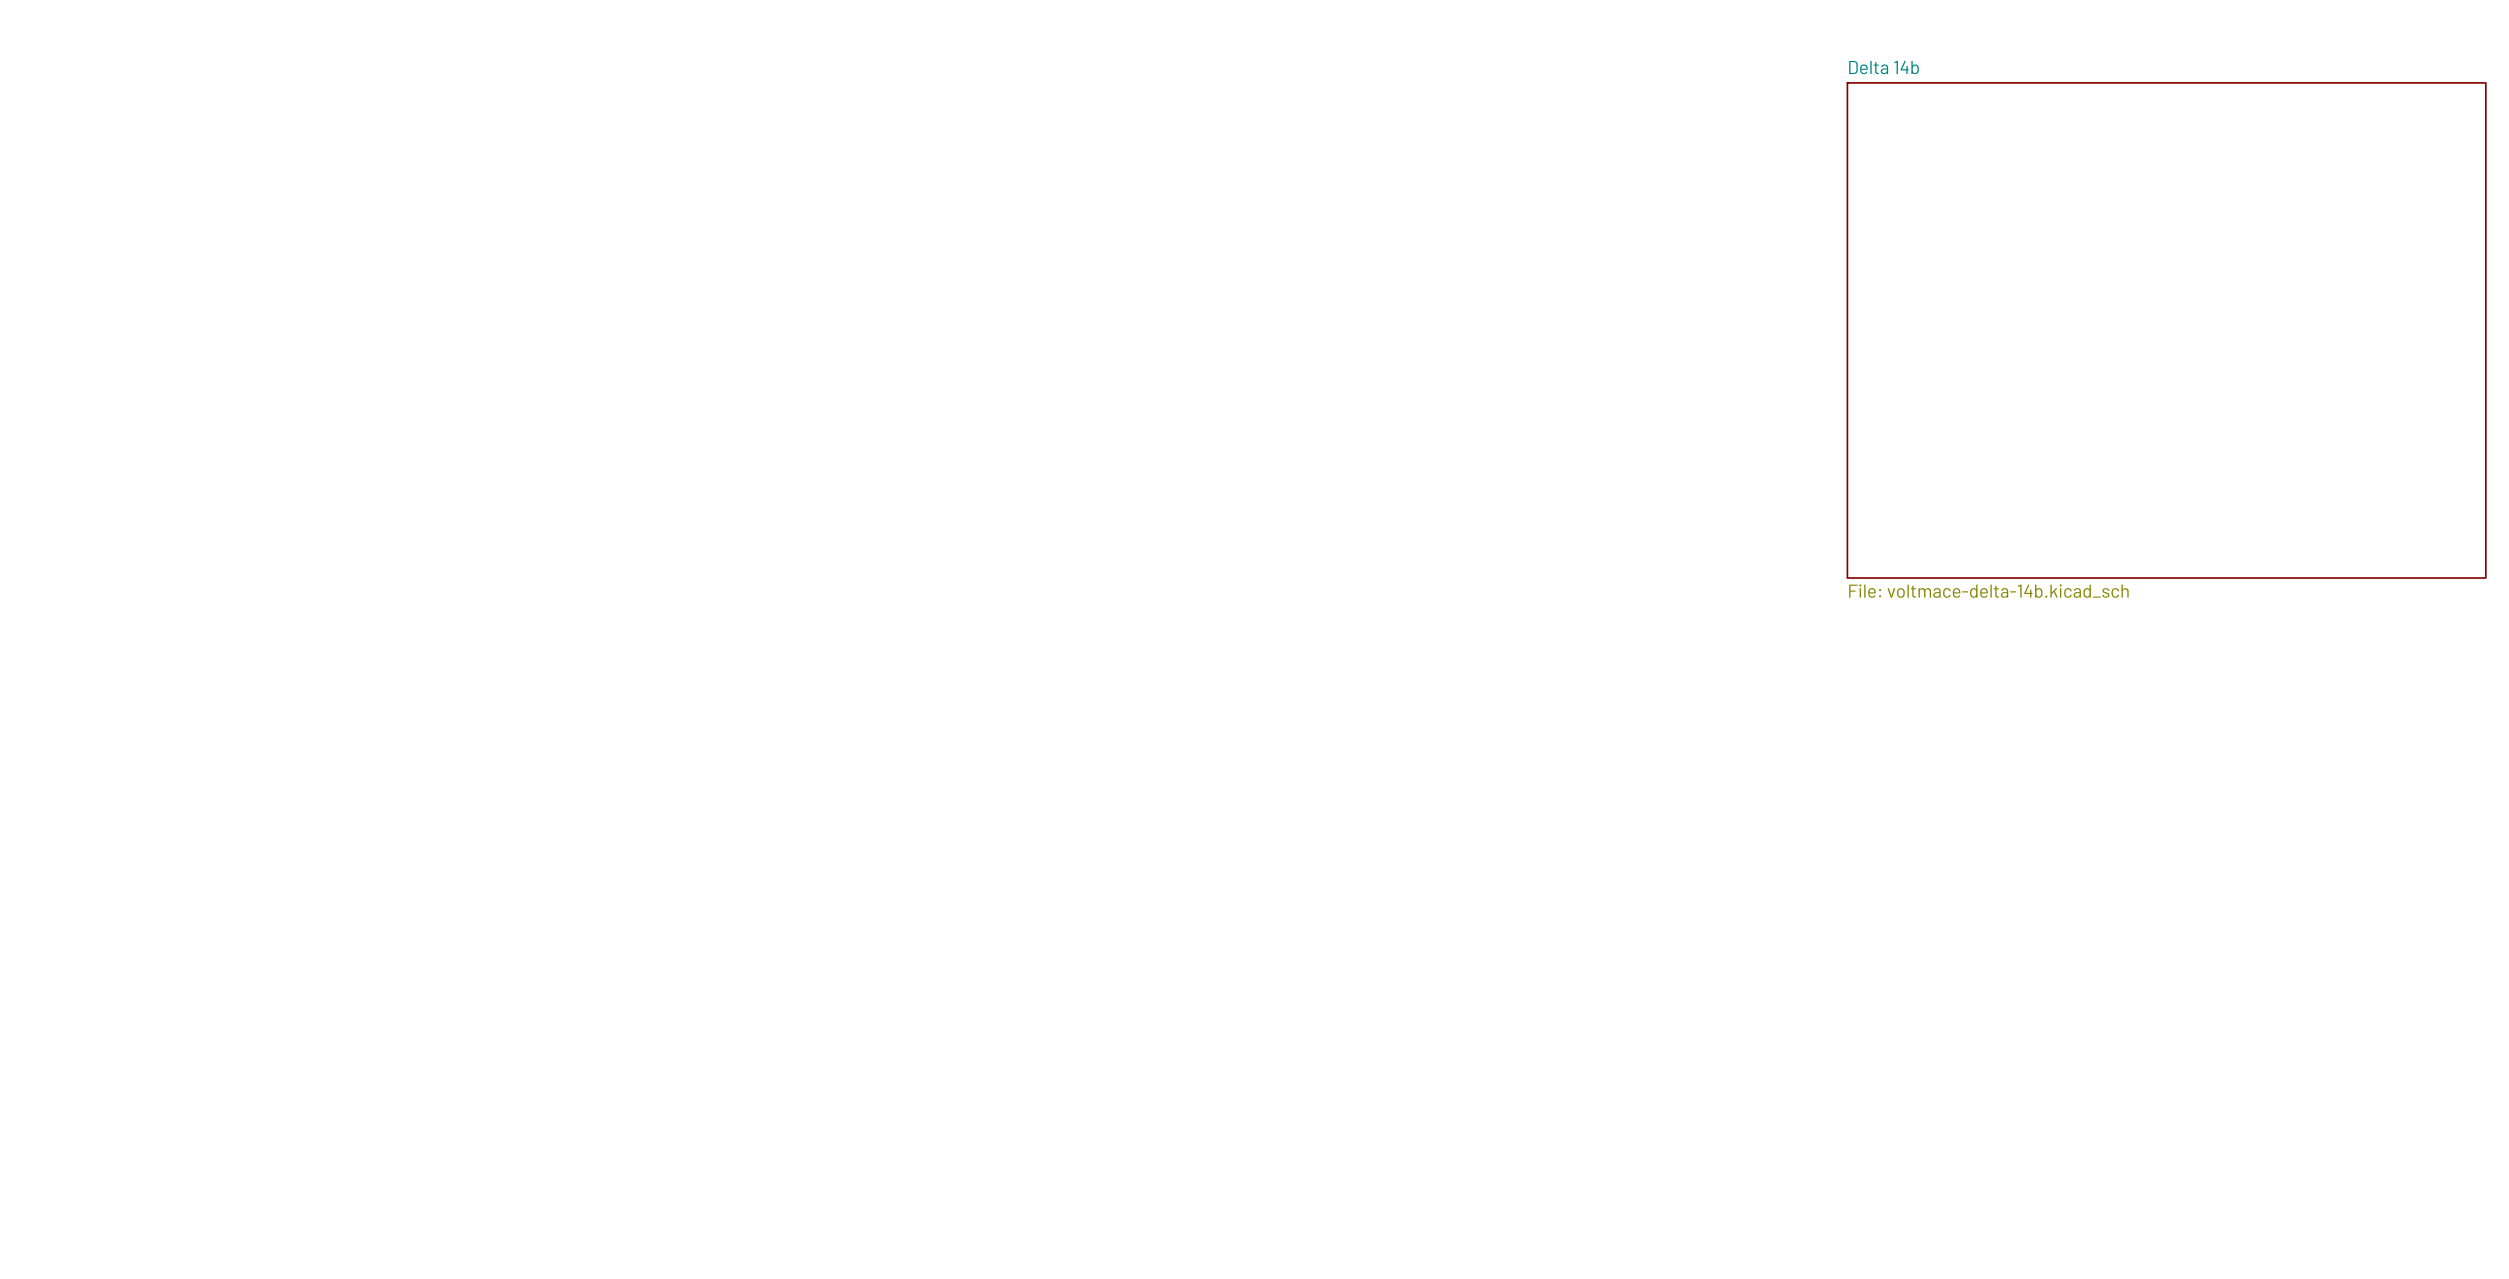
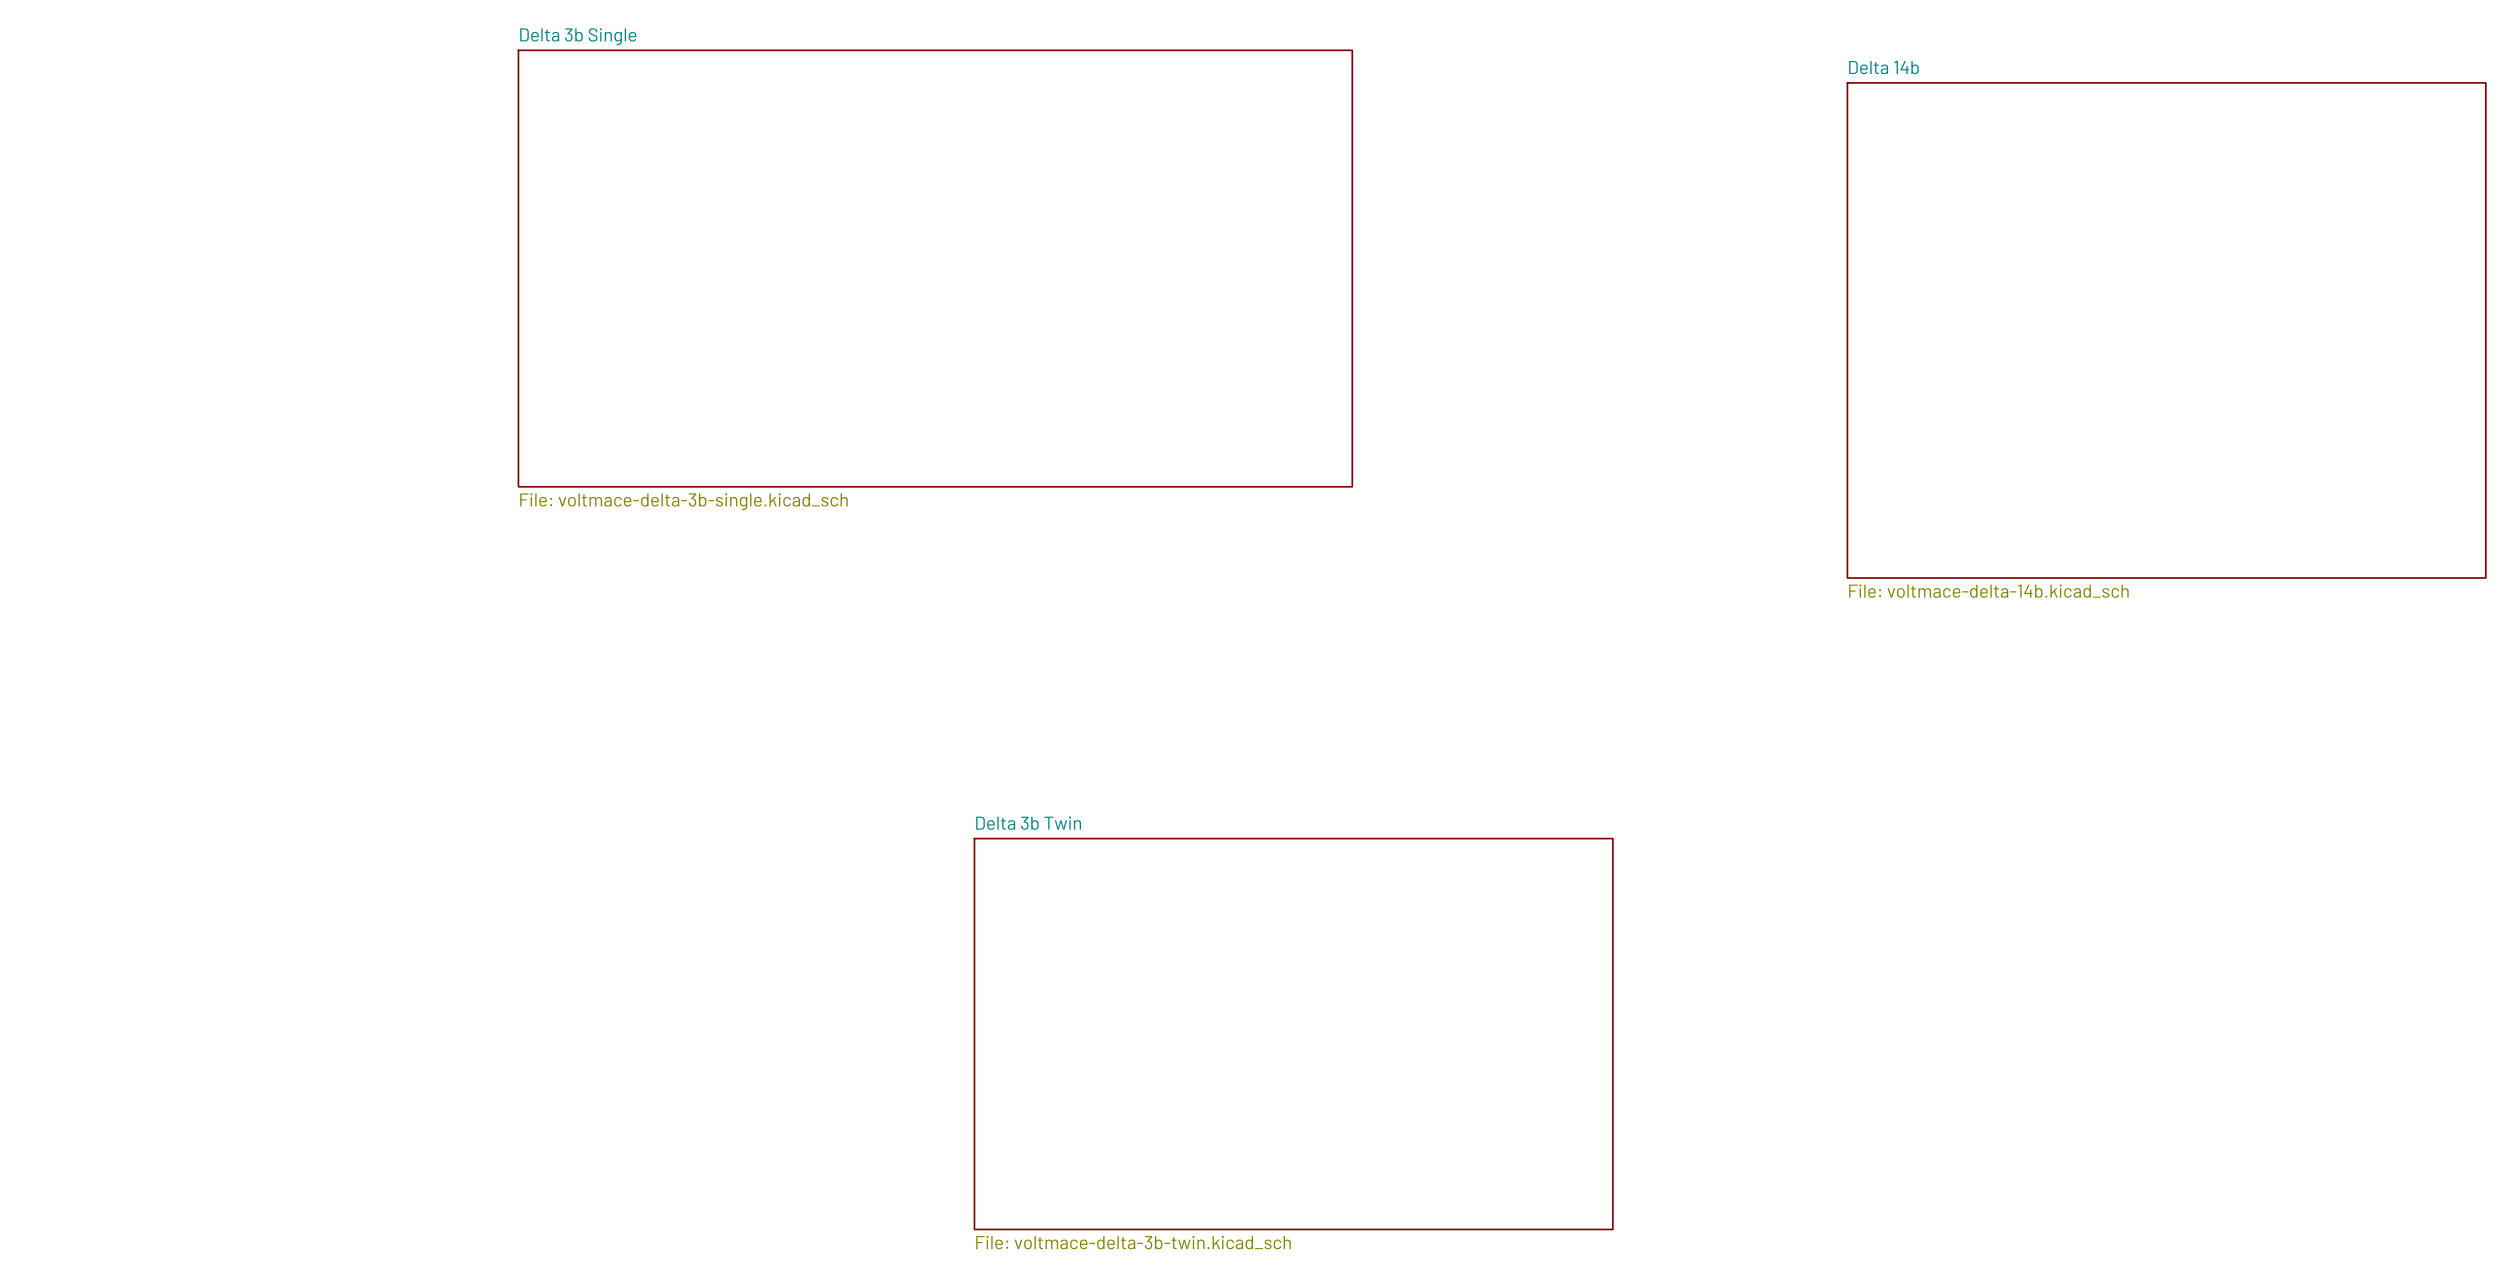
sheet Delta 3b Single: none -> File: voltmace-delta-3b-single.kicad_sch (935, 268)
sheet Delta 3b Twin: none -> File: voltmace-delta-3b-twin.kicad_sch (1293, 1034)

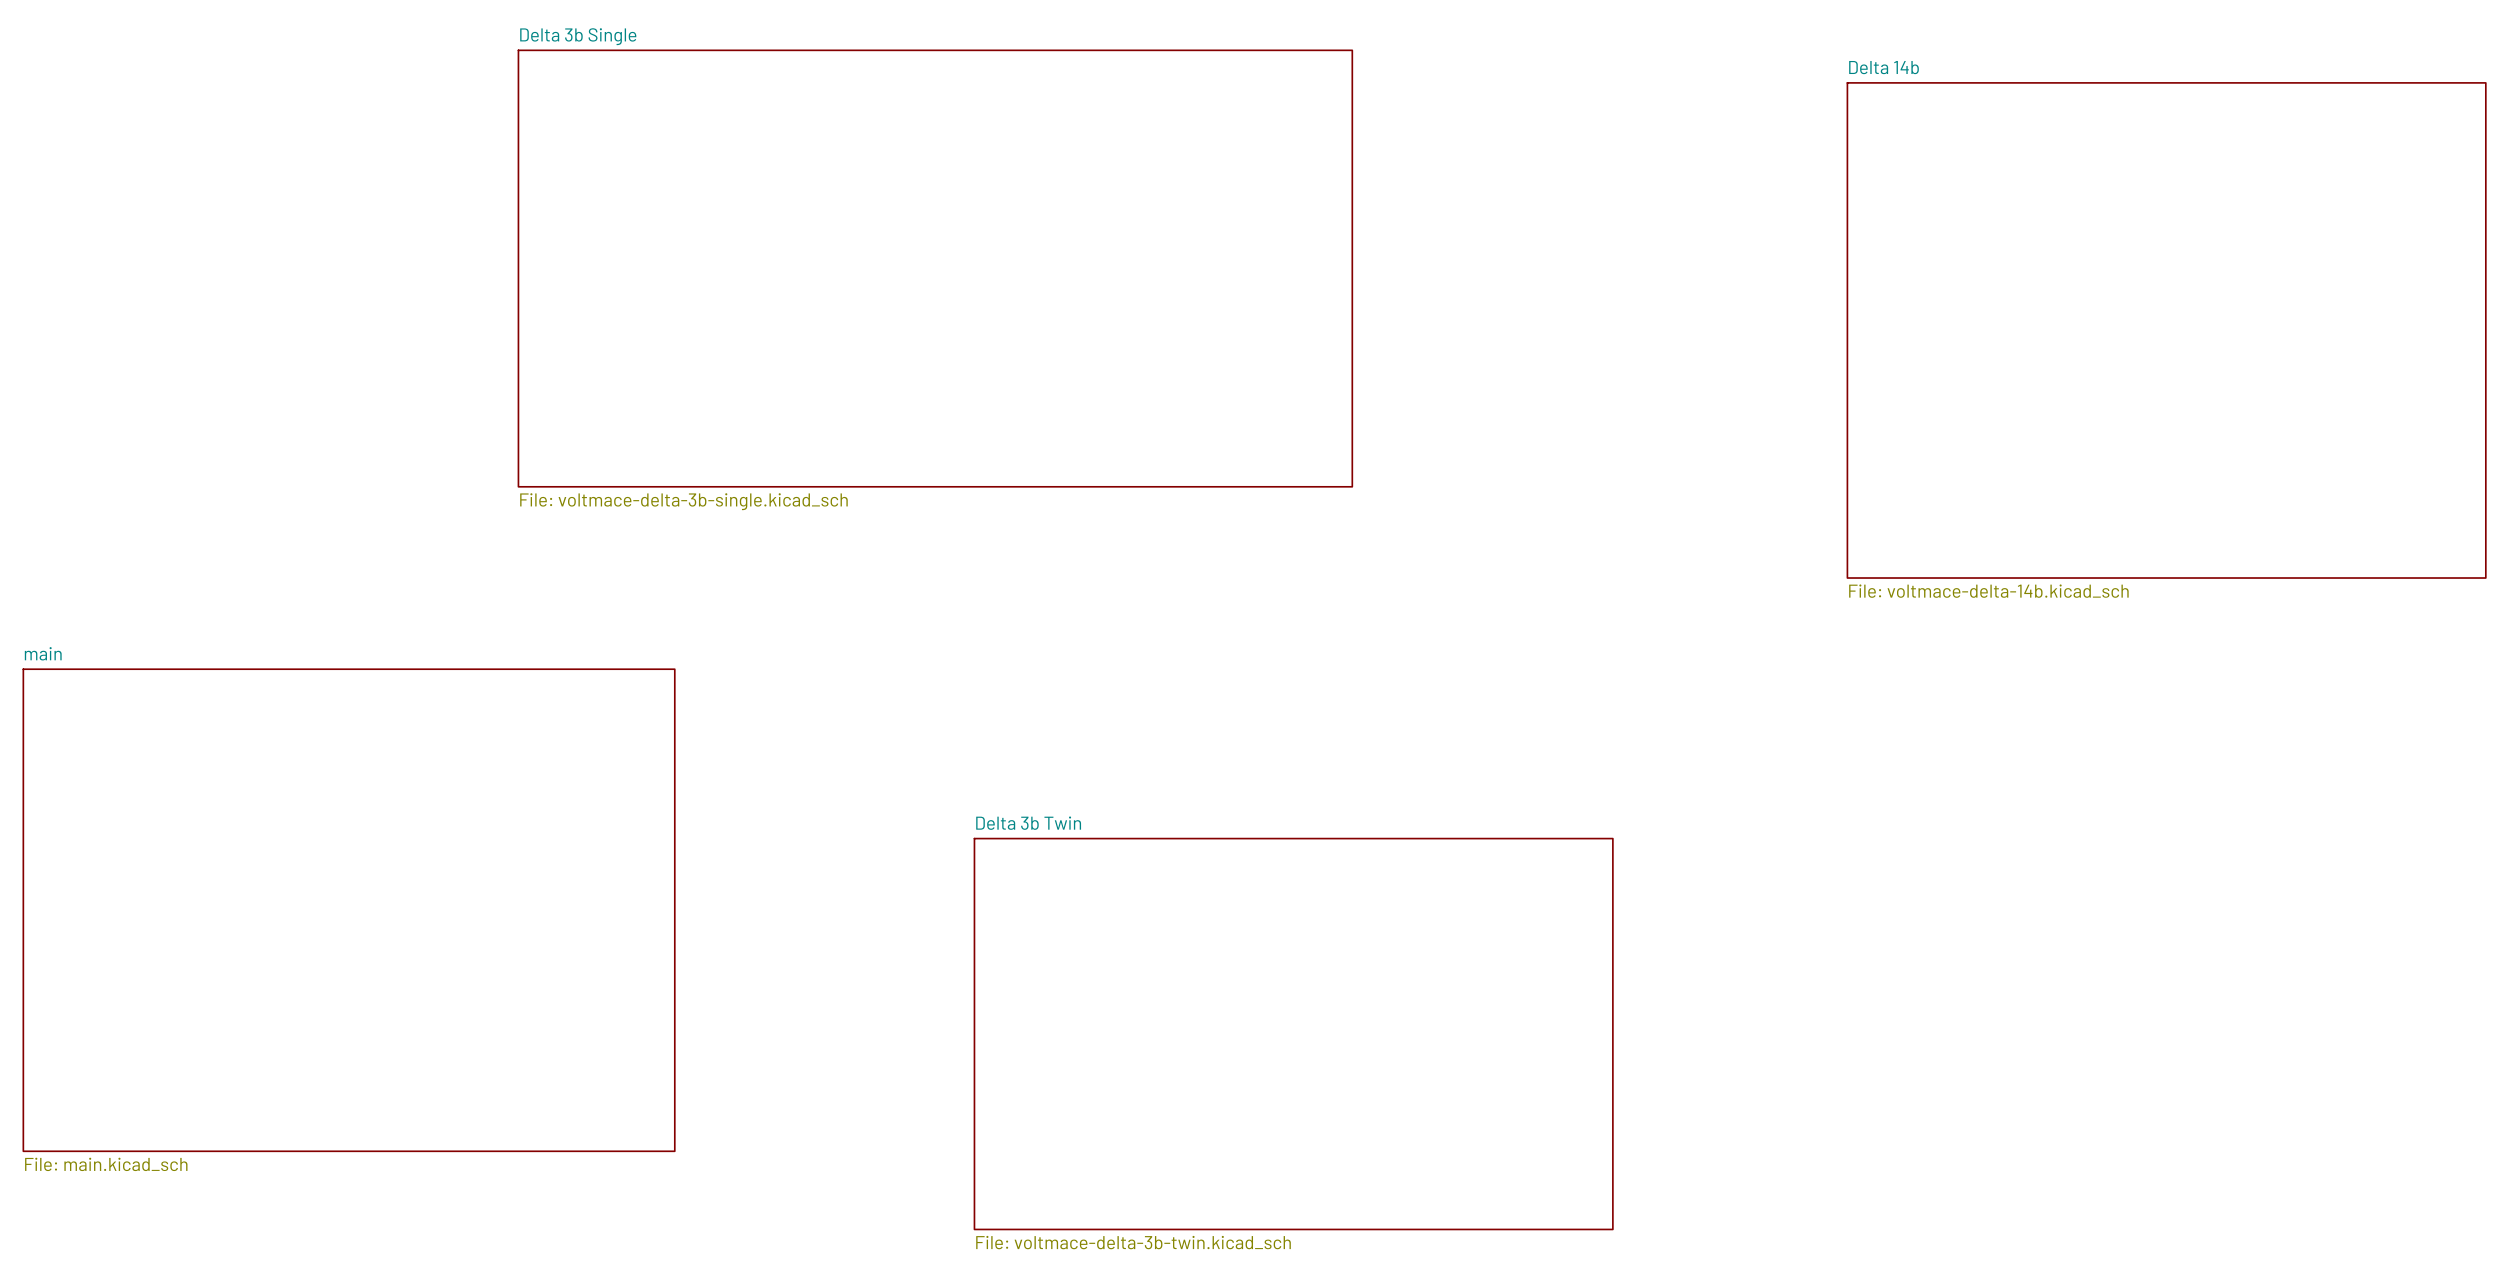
sheet main: none -> File: main.kicad_sch (349, 910)

